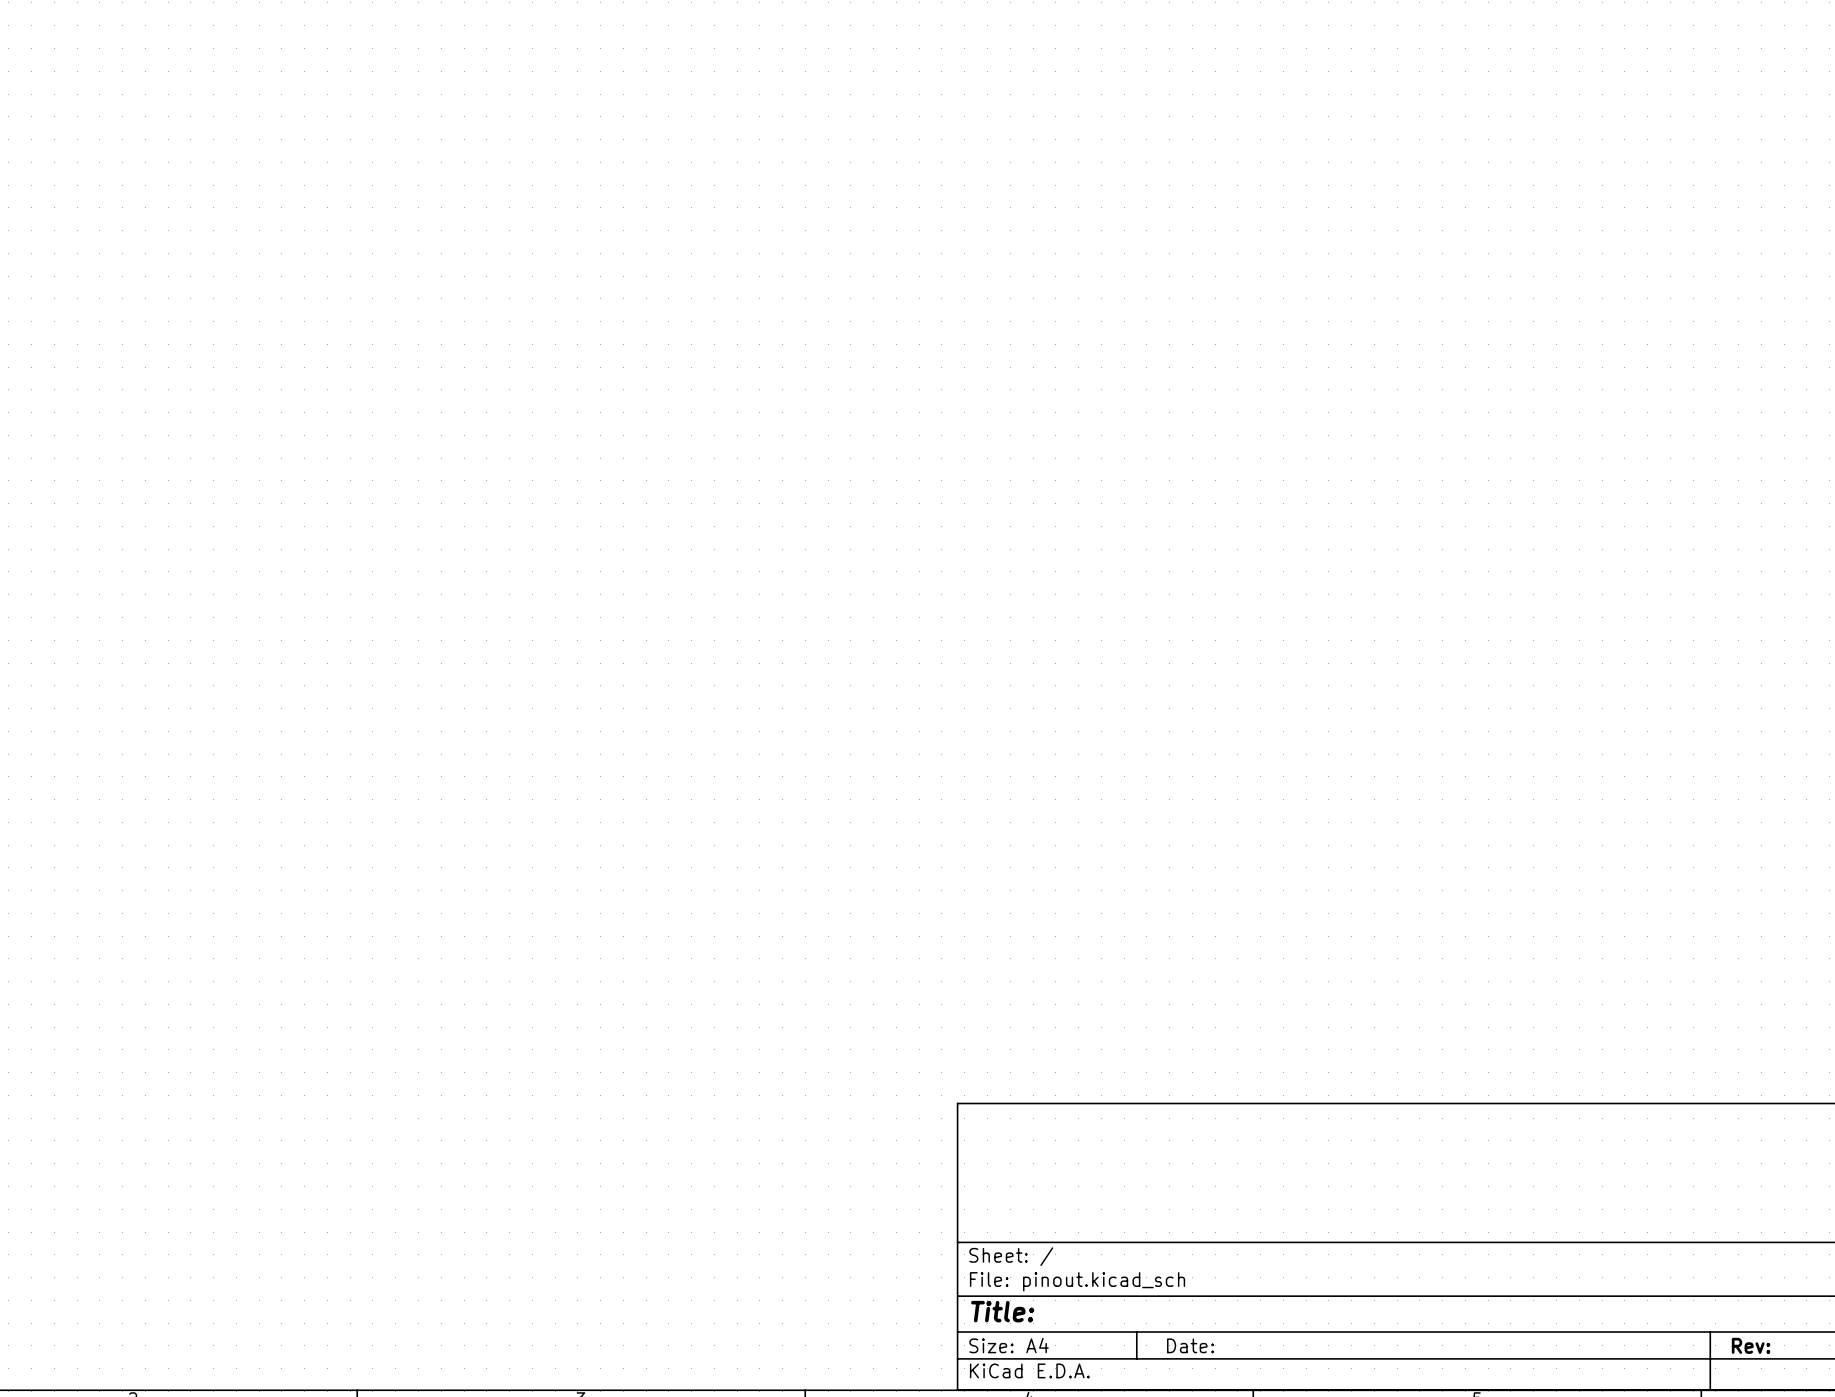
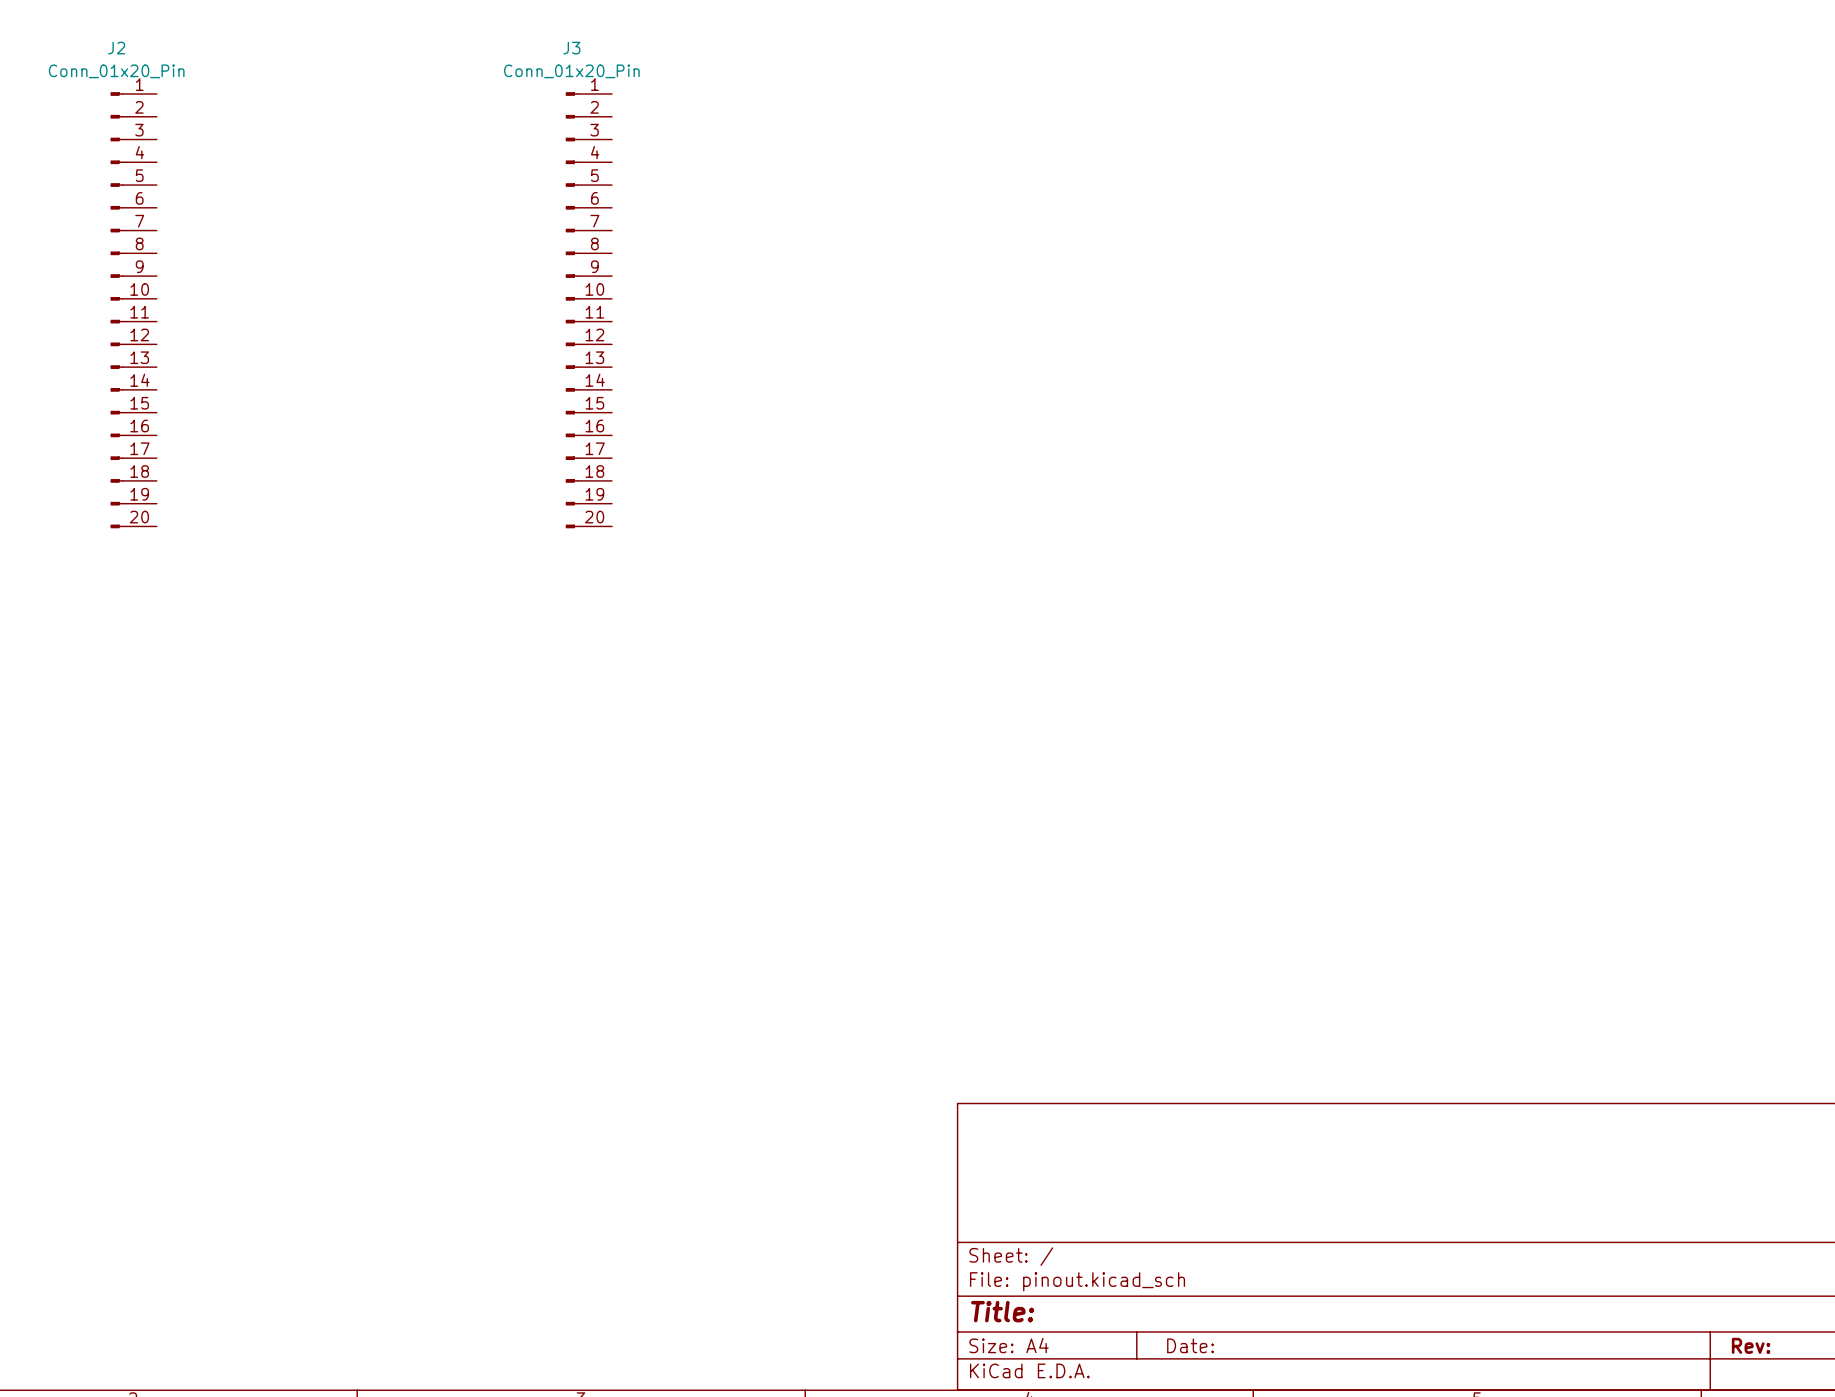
J2: none -> Conn_01x20_Pin (133, 310)
J3: none -> Conn_01x20_Pin (588, 310)

